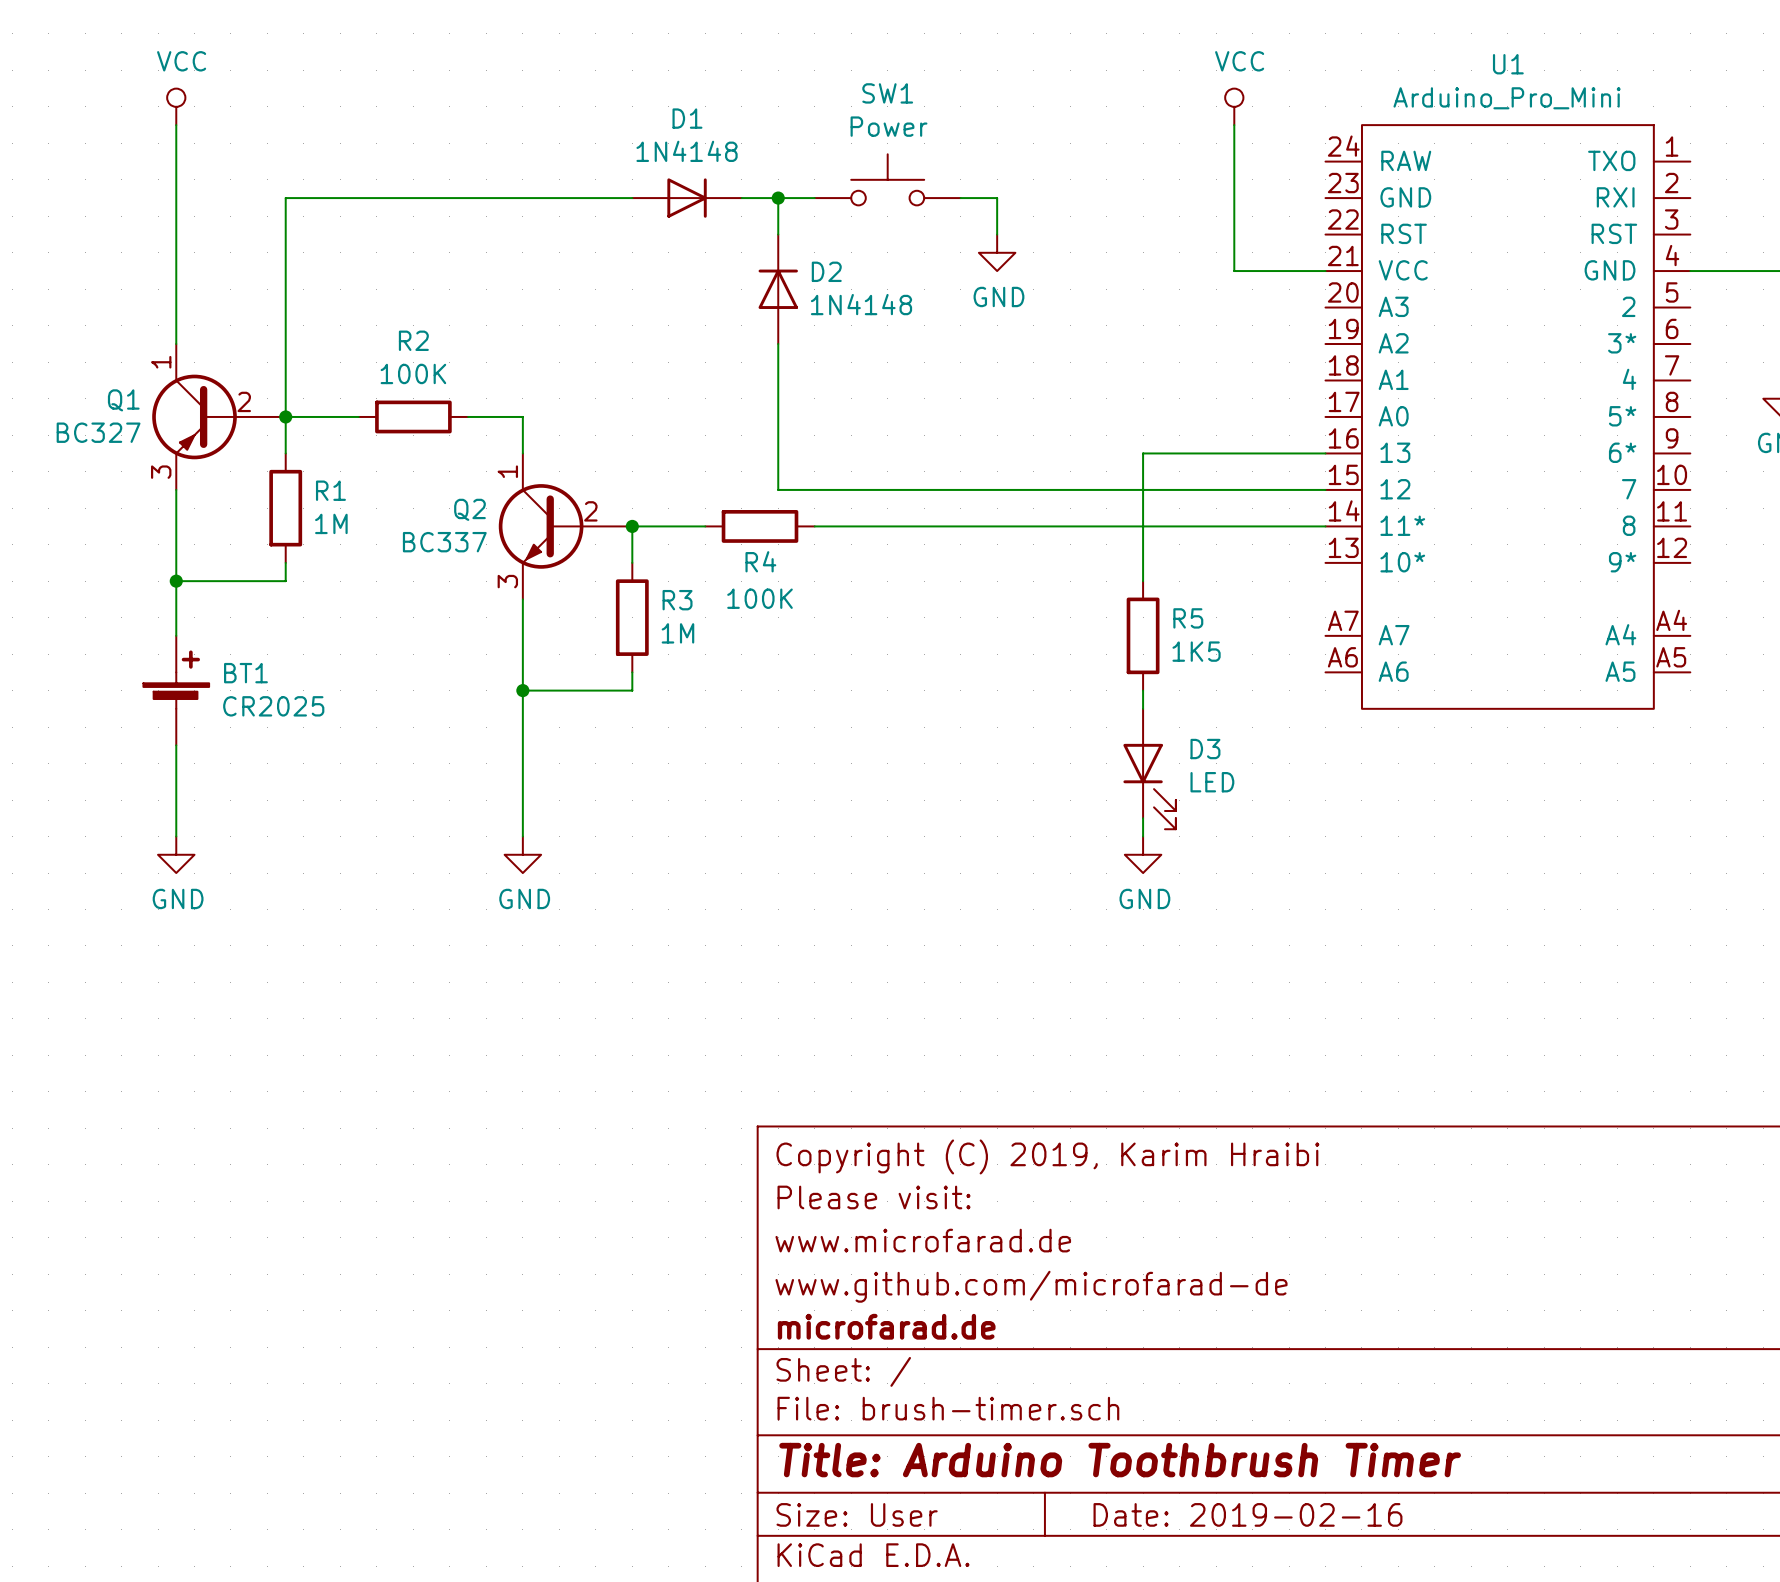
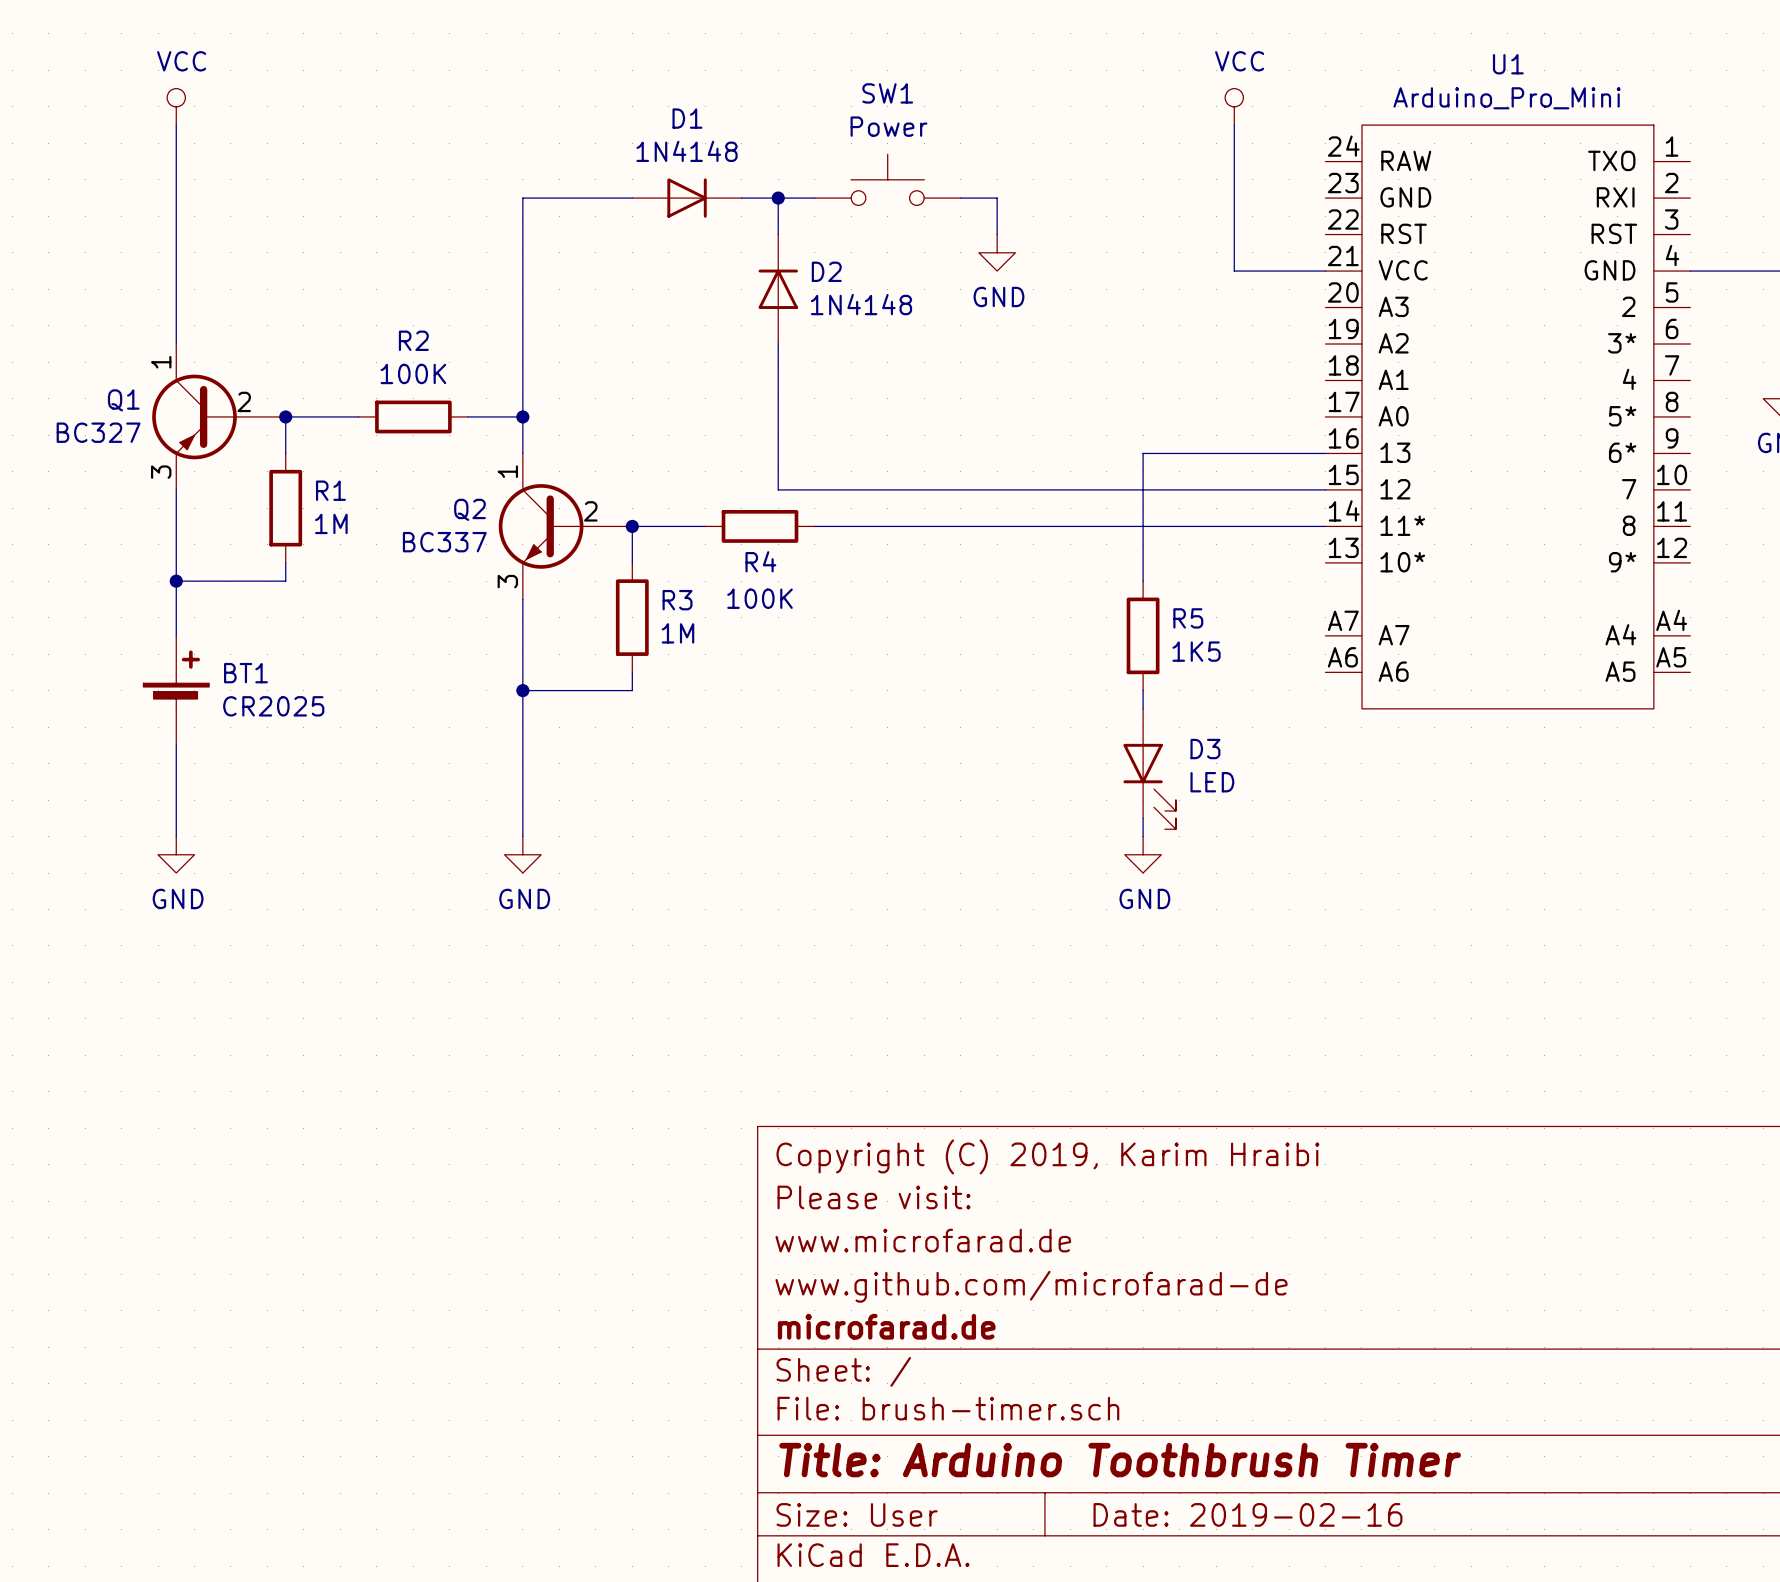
wire: (522, 198) (285, 198) (285, 416) -> (522, 198) (522, 416)
junction: none -> (522, 416)

